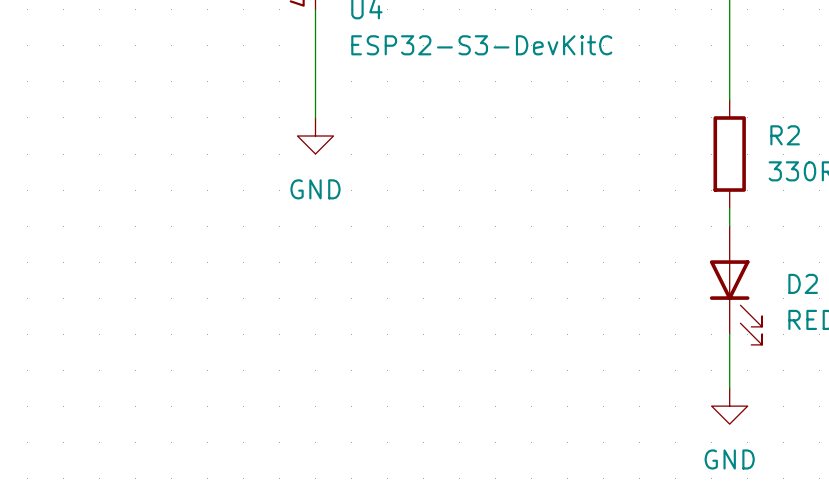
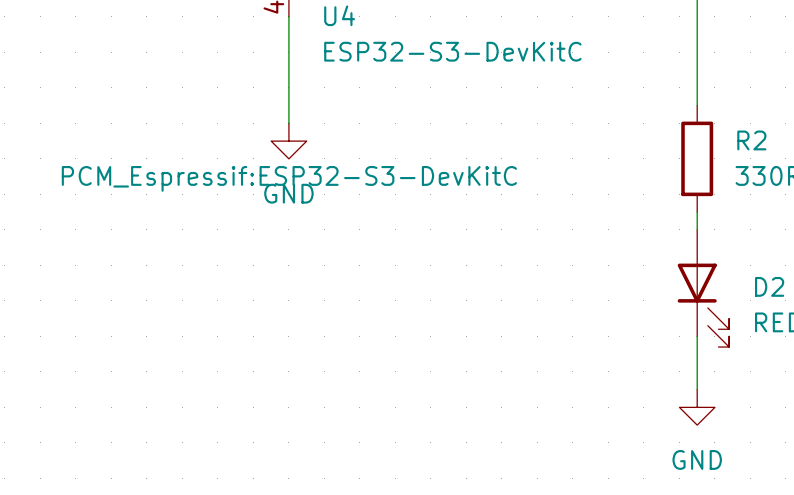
U4 text: none -> PCM_Espressif:ESP32-S3-DevKitC (289, 178)

